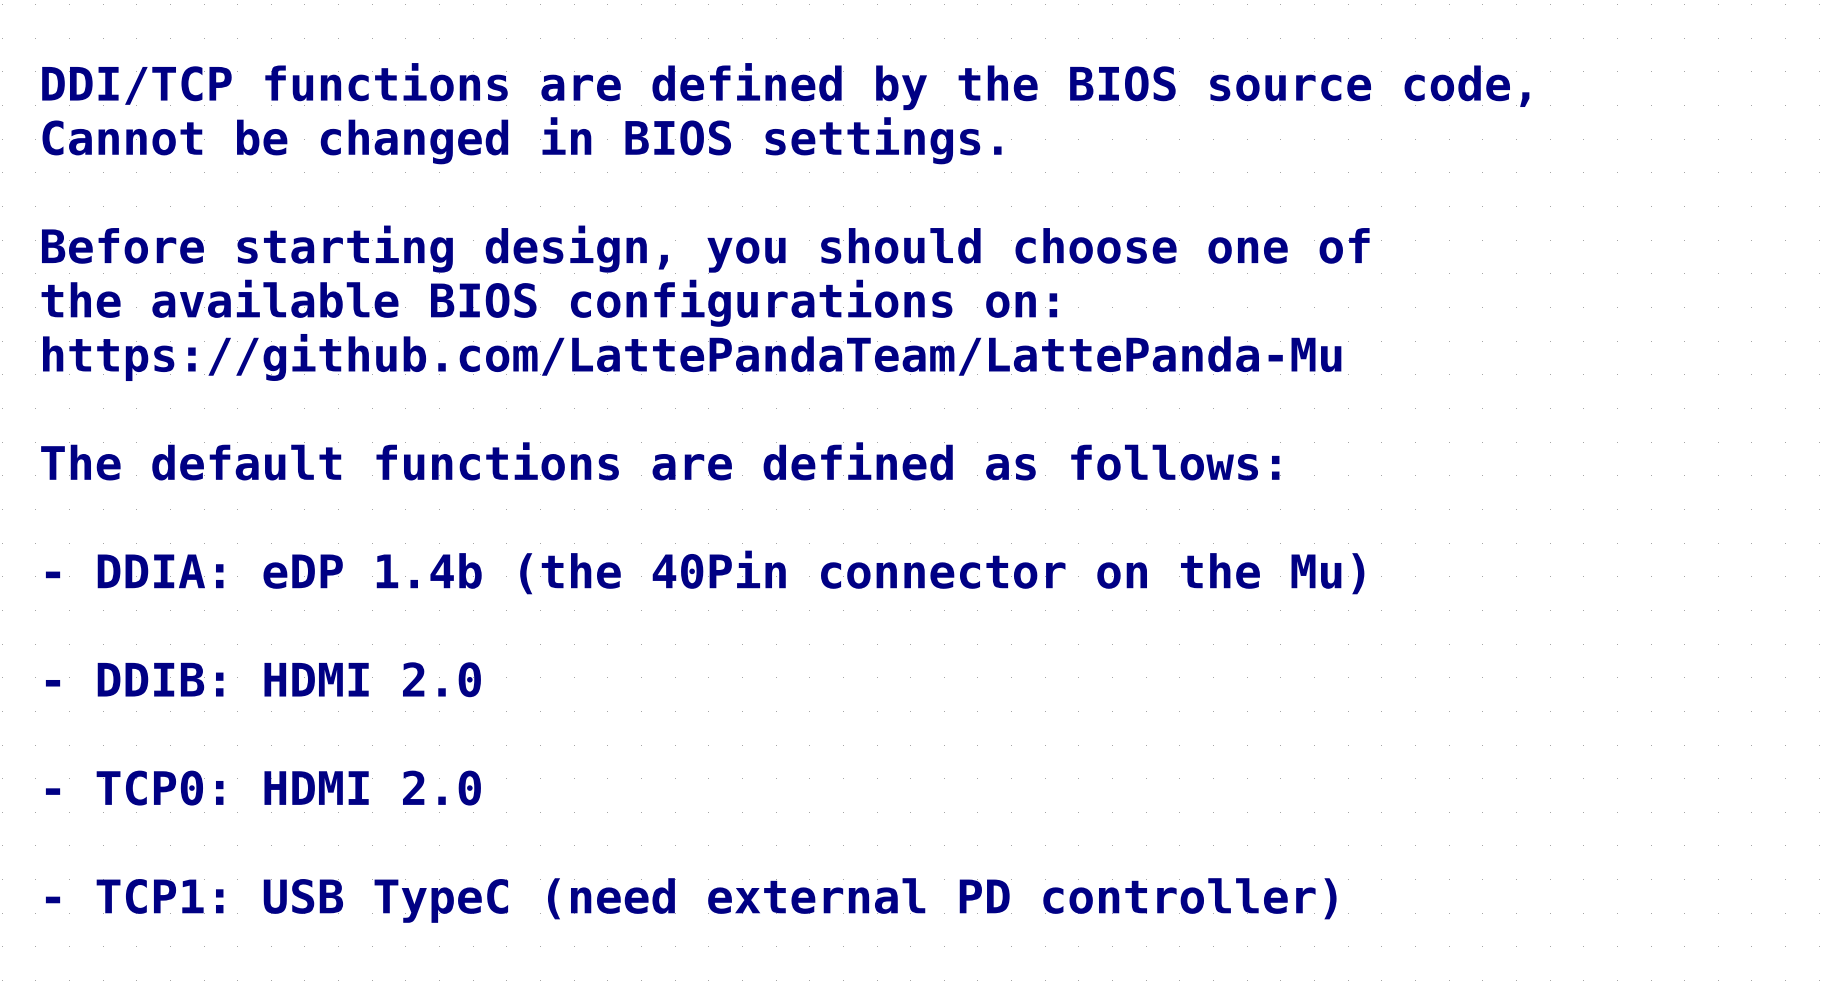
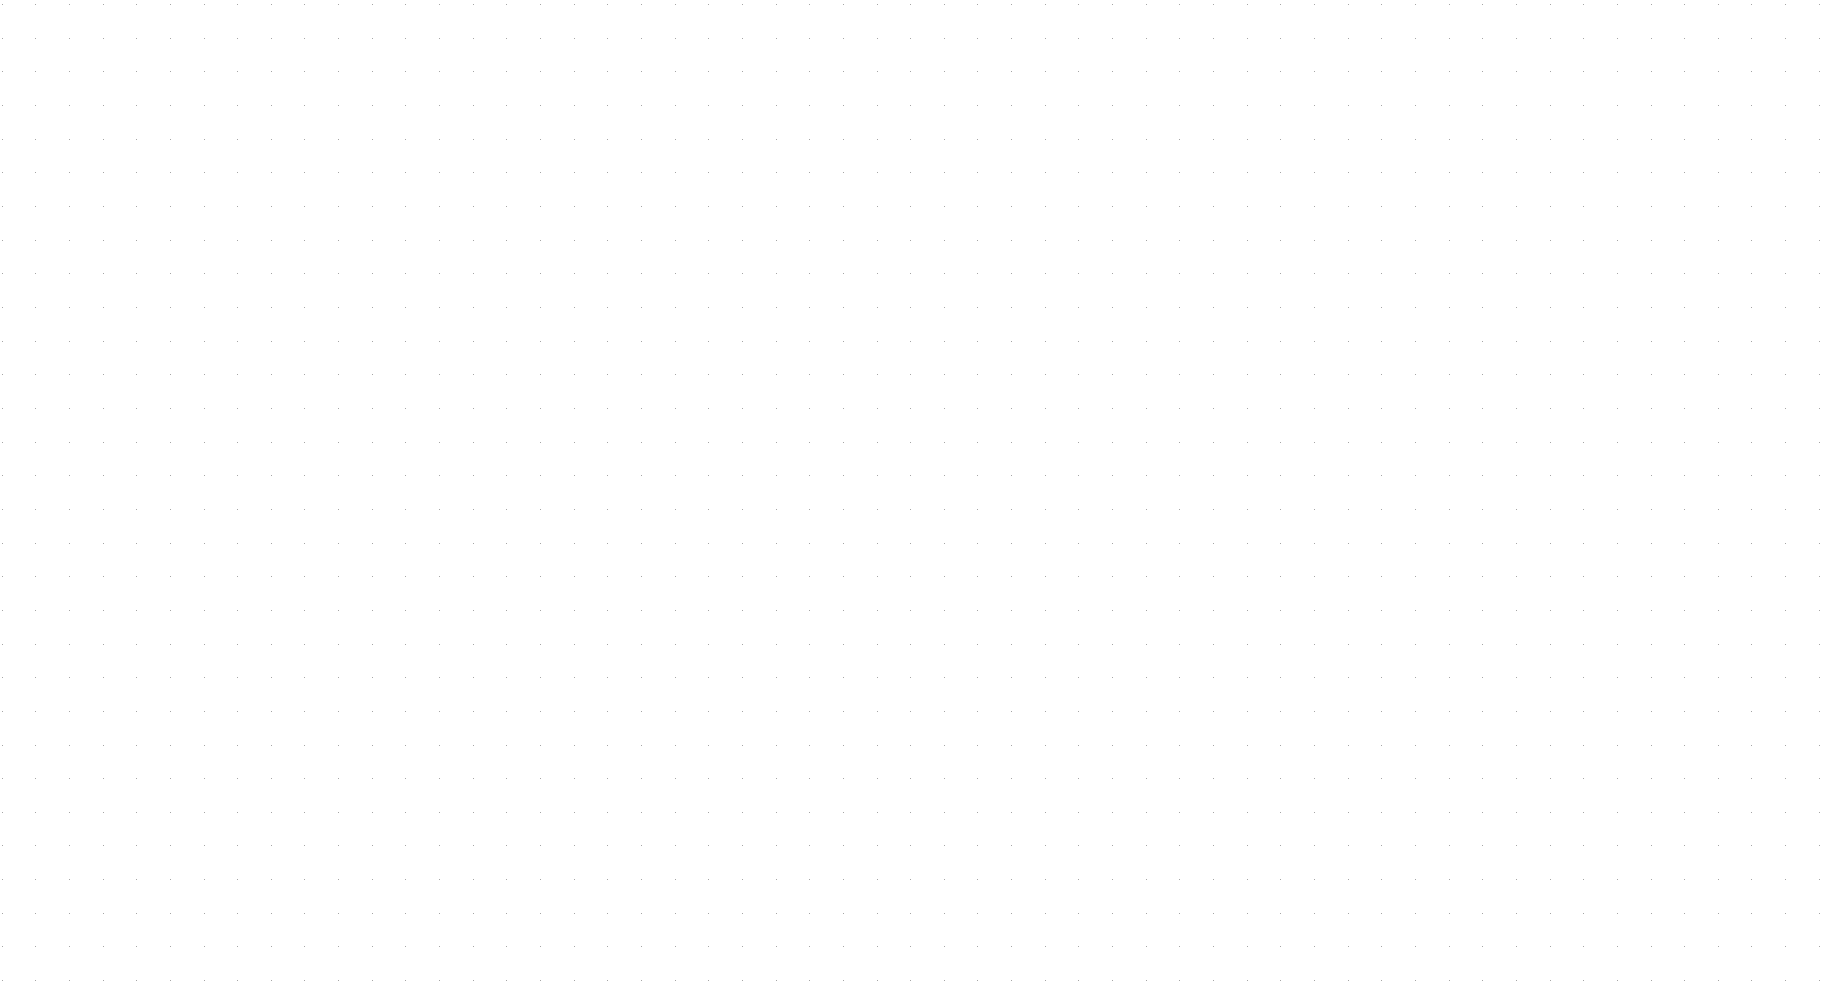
text: DDI/TCP functions are defined by the BIOS source code, (785, 86) -> none
text: Cannot be changed in BIOS settings. (522, 140) -> none
text: Before starting design, you should choose one of (705, 249) -> none
text: the available BIOS configurations on: (549, 303) -> none
text: https://github.com/LattePandaTeam/LattePanda-Mu (692, 357) -> none
text: The default functions are defined as follows: (660, 461) -> none
text: - DDIA: eDP 1.4b (the 40Pin connector on the Mu) (705, 572) -> none
text: - DDIB: HDMI 2.0 (263, 679) -> none
text: - TCP0: HDMI 2.0 (263, 788) -> none
text: - TCP1: USB TypeC (need external PD controller) (691, 900) -> none

